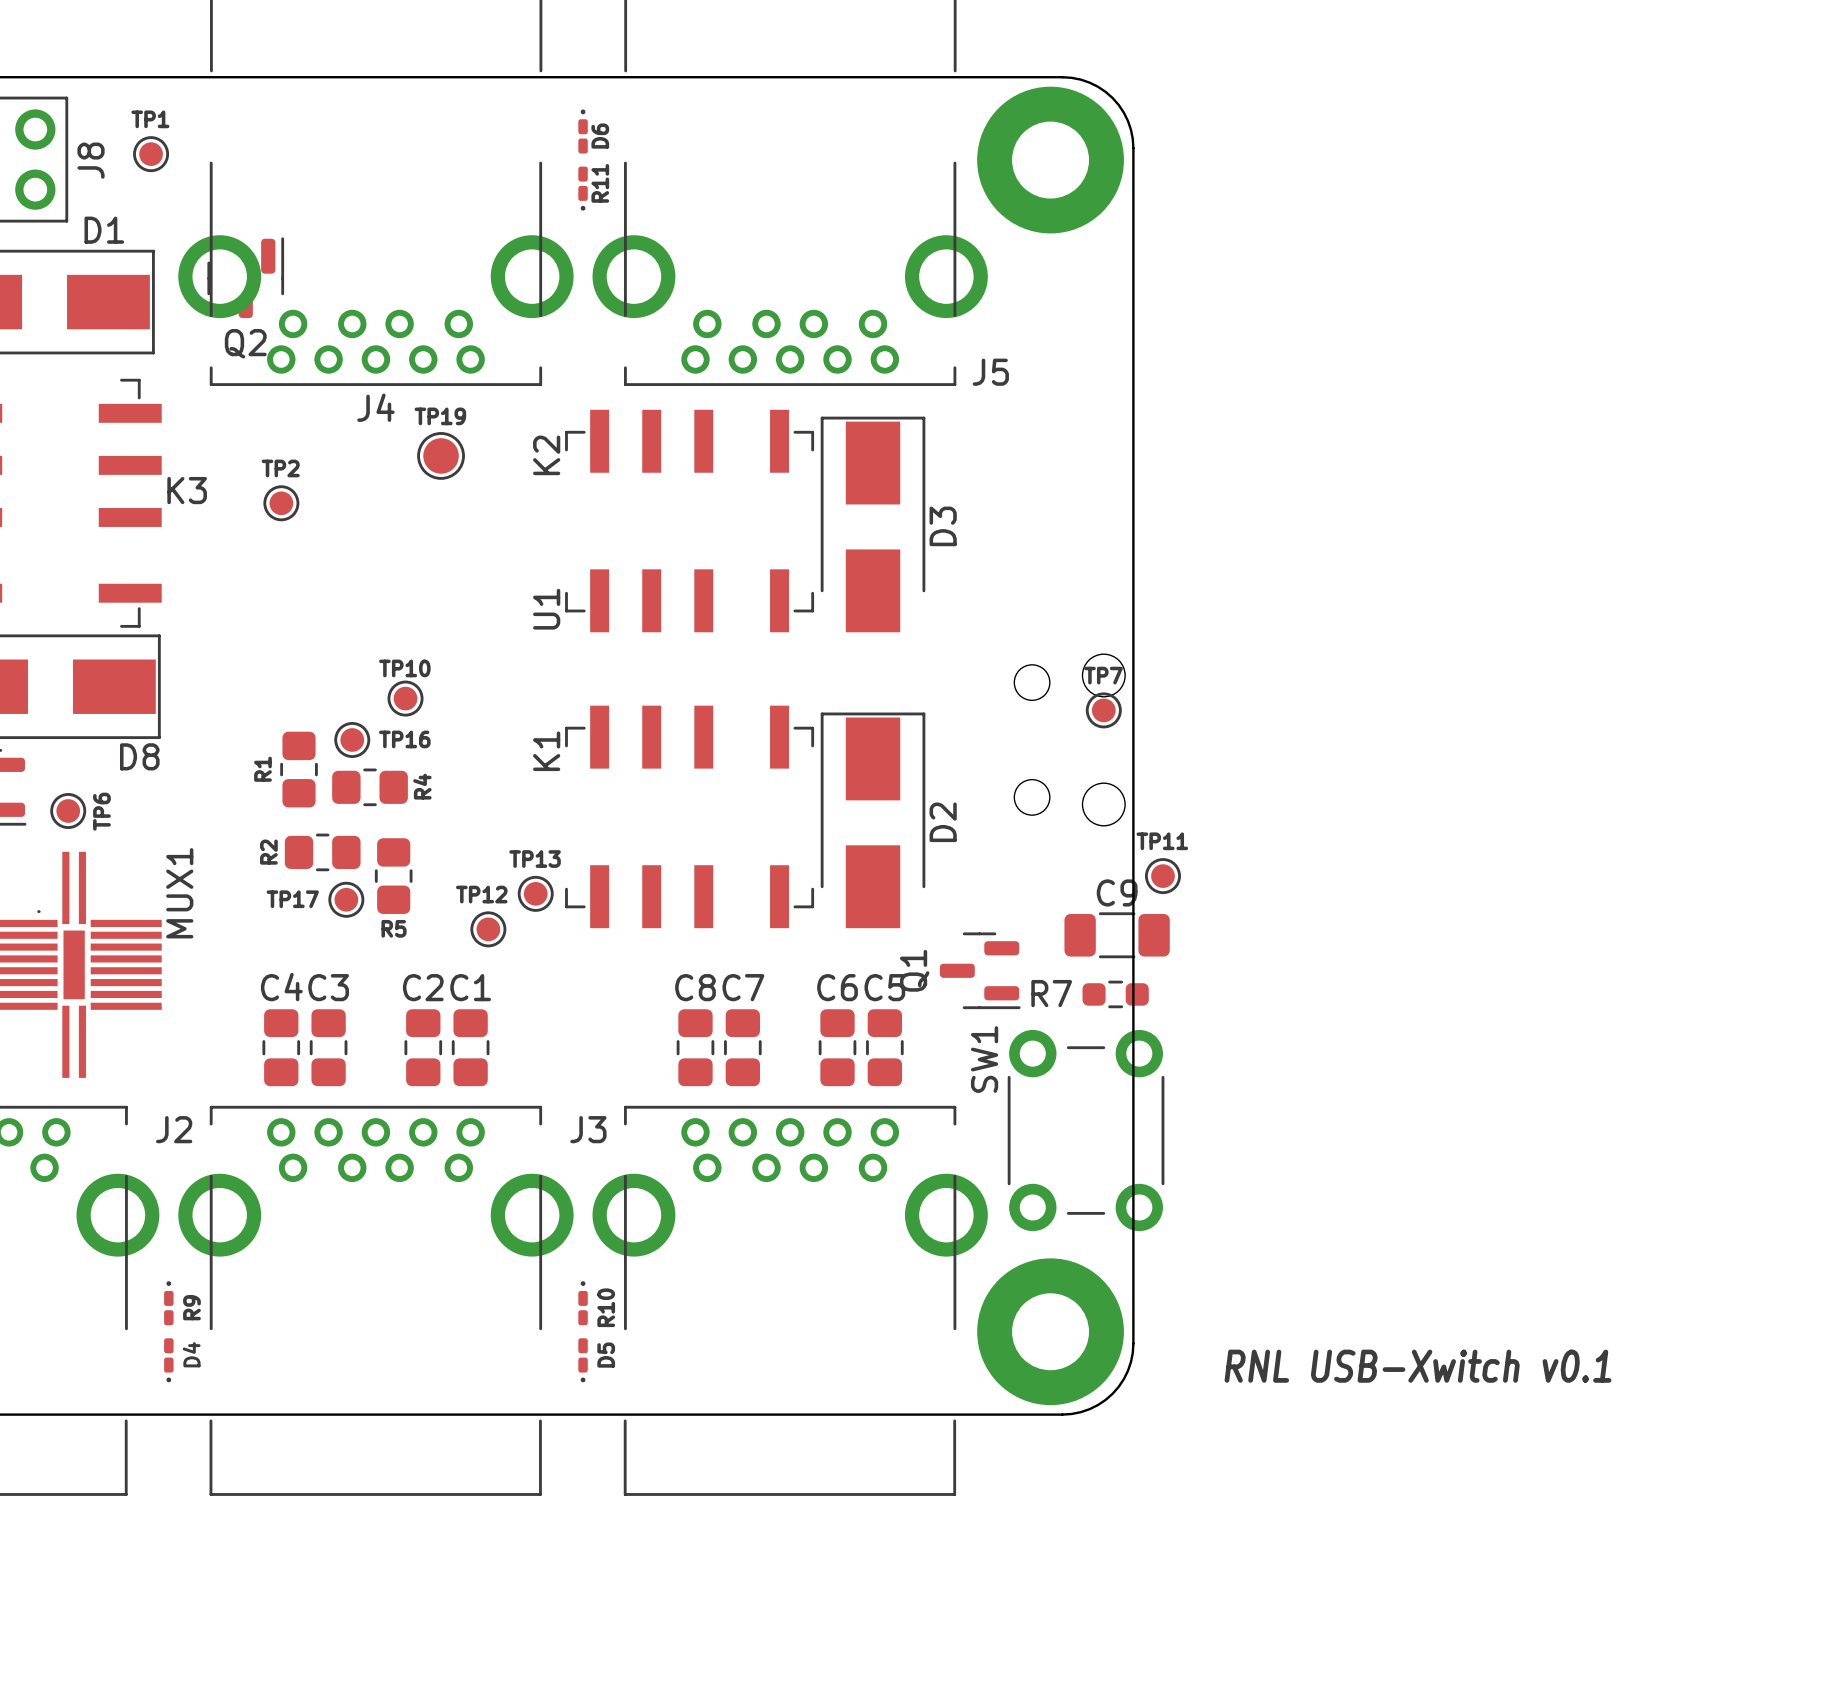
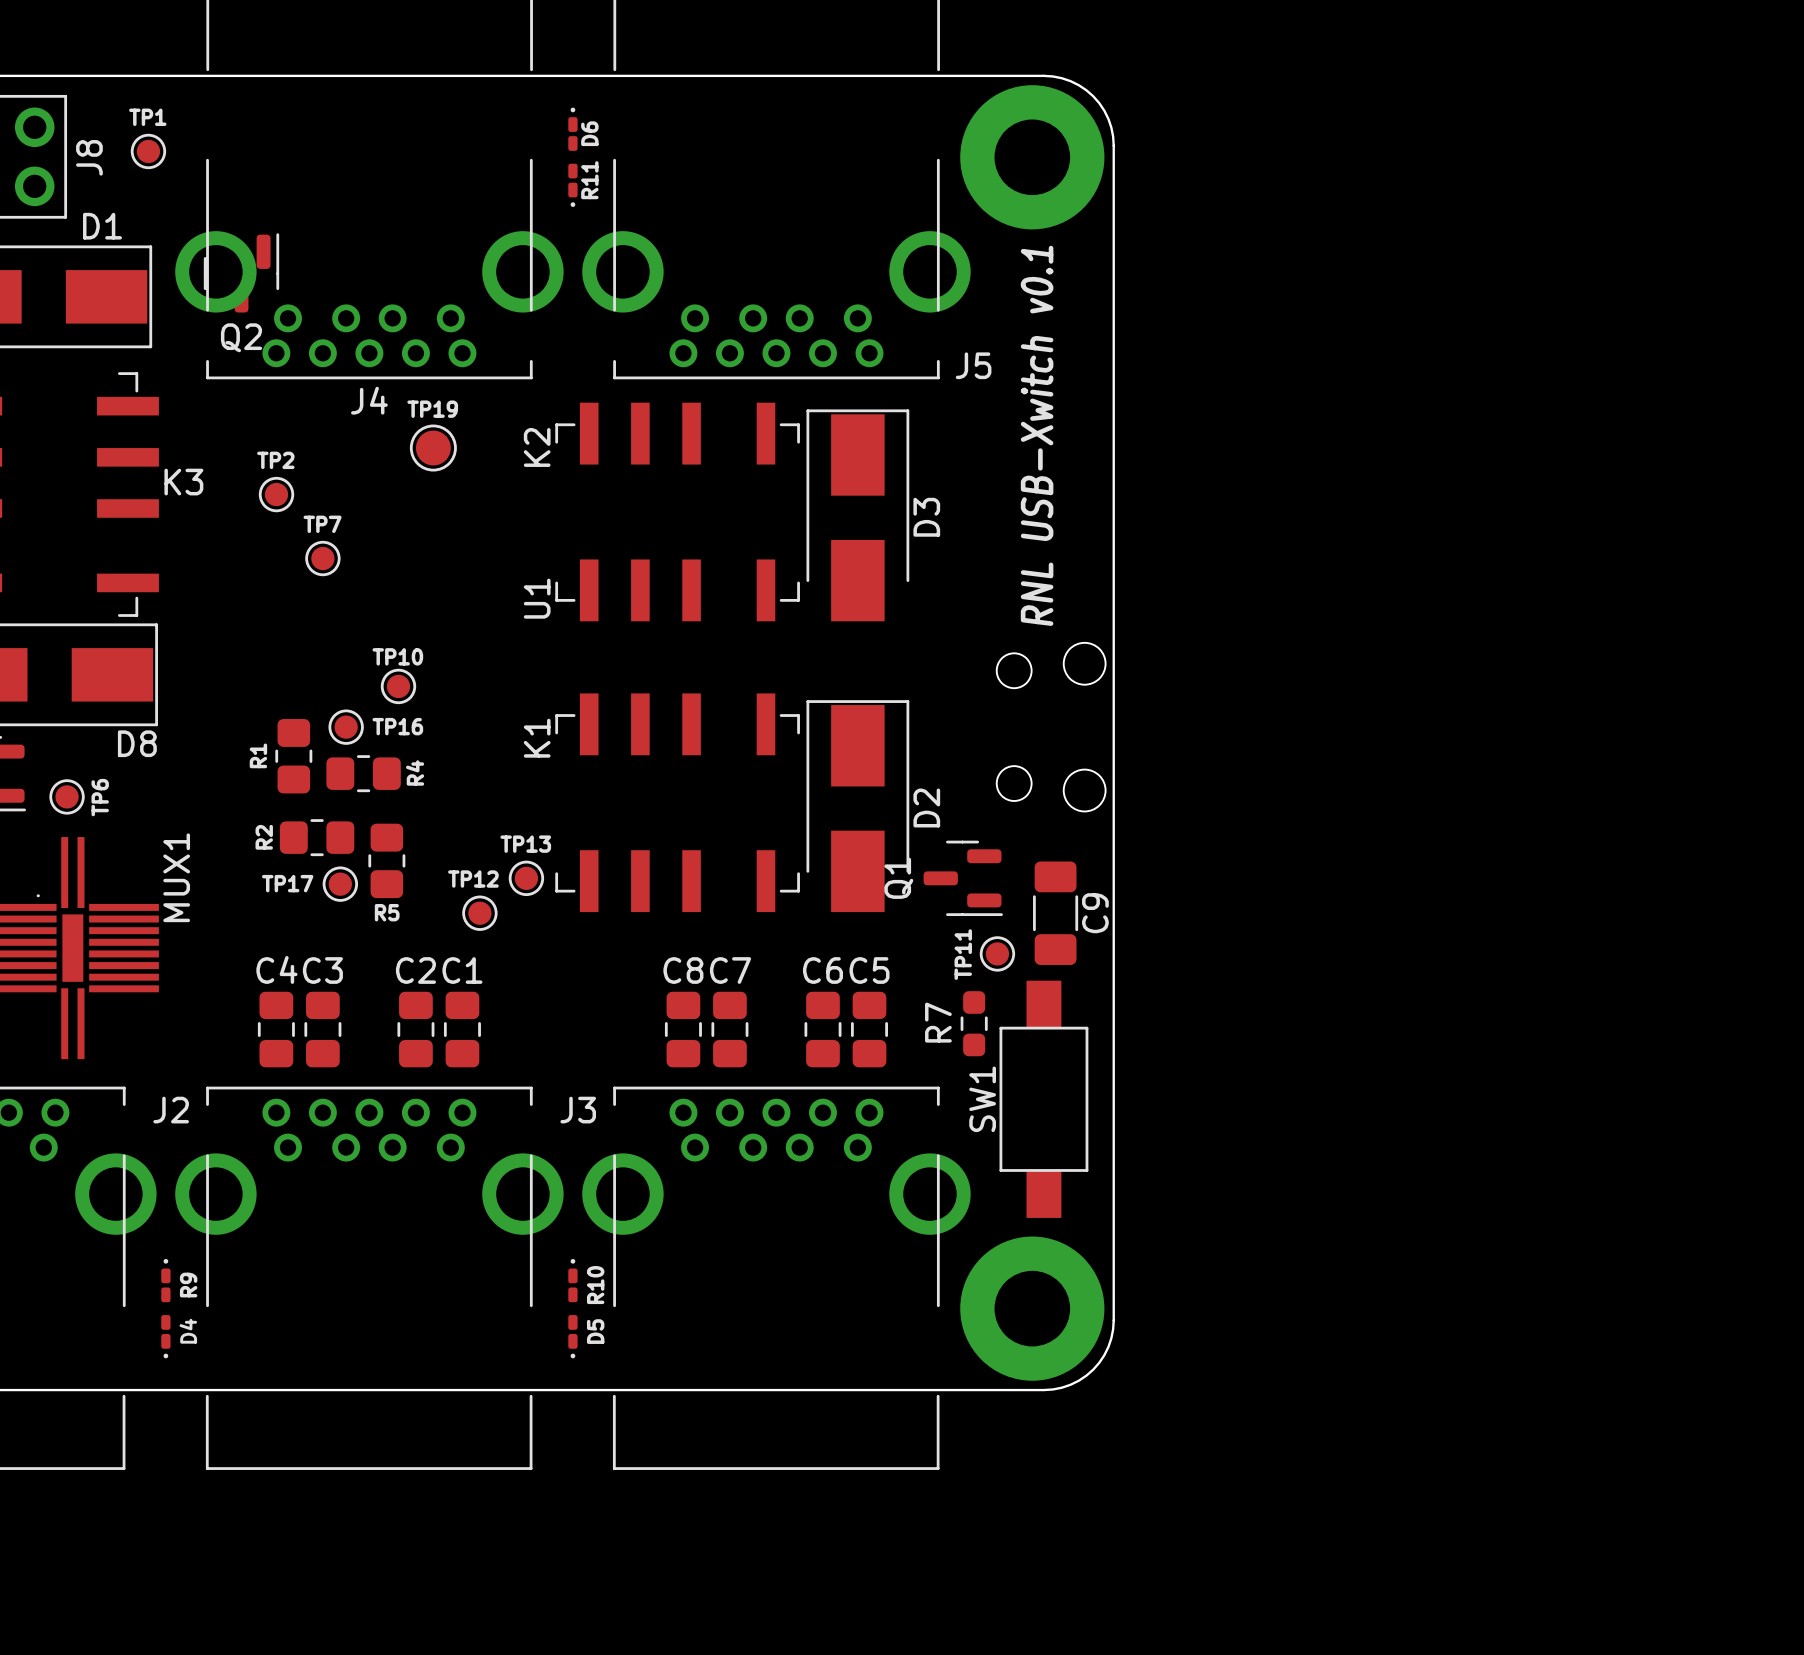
text: none -> RNL USB-Xwitch v0.1 (1037, 435)
TP7 position: (1103, 710) -> (322, 558)
TP11 name rotation: 0° (1162, 841) -> 90° counterclockwise (963, 954)
TP11 position: (1162, 876) -> (997, 953)
C9 rotation: 0° (1117, 935) -> 90° clockwise (1055, 913)
Q1 position: (980, 970) -> (963, 878)
R7 rotation: 0° (1115, 994) -> 90° clockwise (974, 1023)
R7 position: (1115, 994) -> (974, 1023)
SW1 footprint: [1007, 1029, 1165, 1232] -> [999, 980, 1089, 1218]
SW1 name position: SW1 (984, 1059) -> SW1 (982, 1099)
text: RNL USB-Xwitch v0.1 (1418, 1366) -> none

